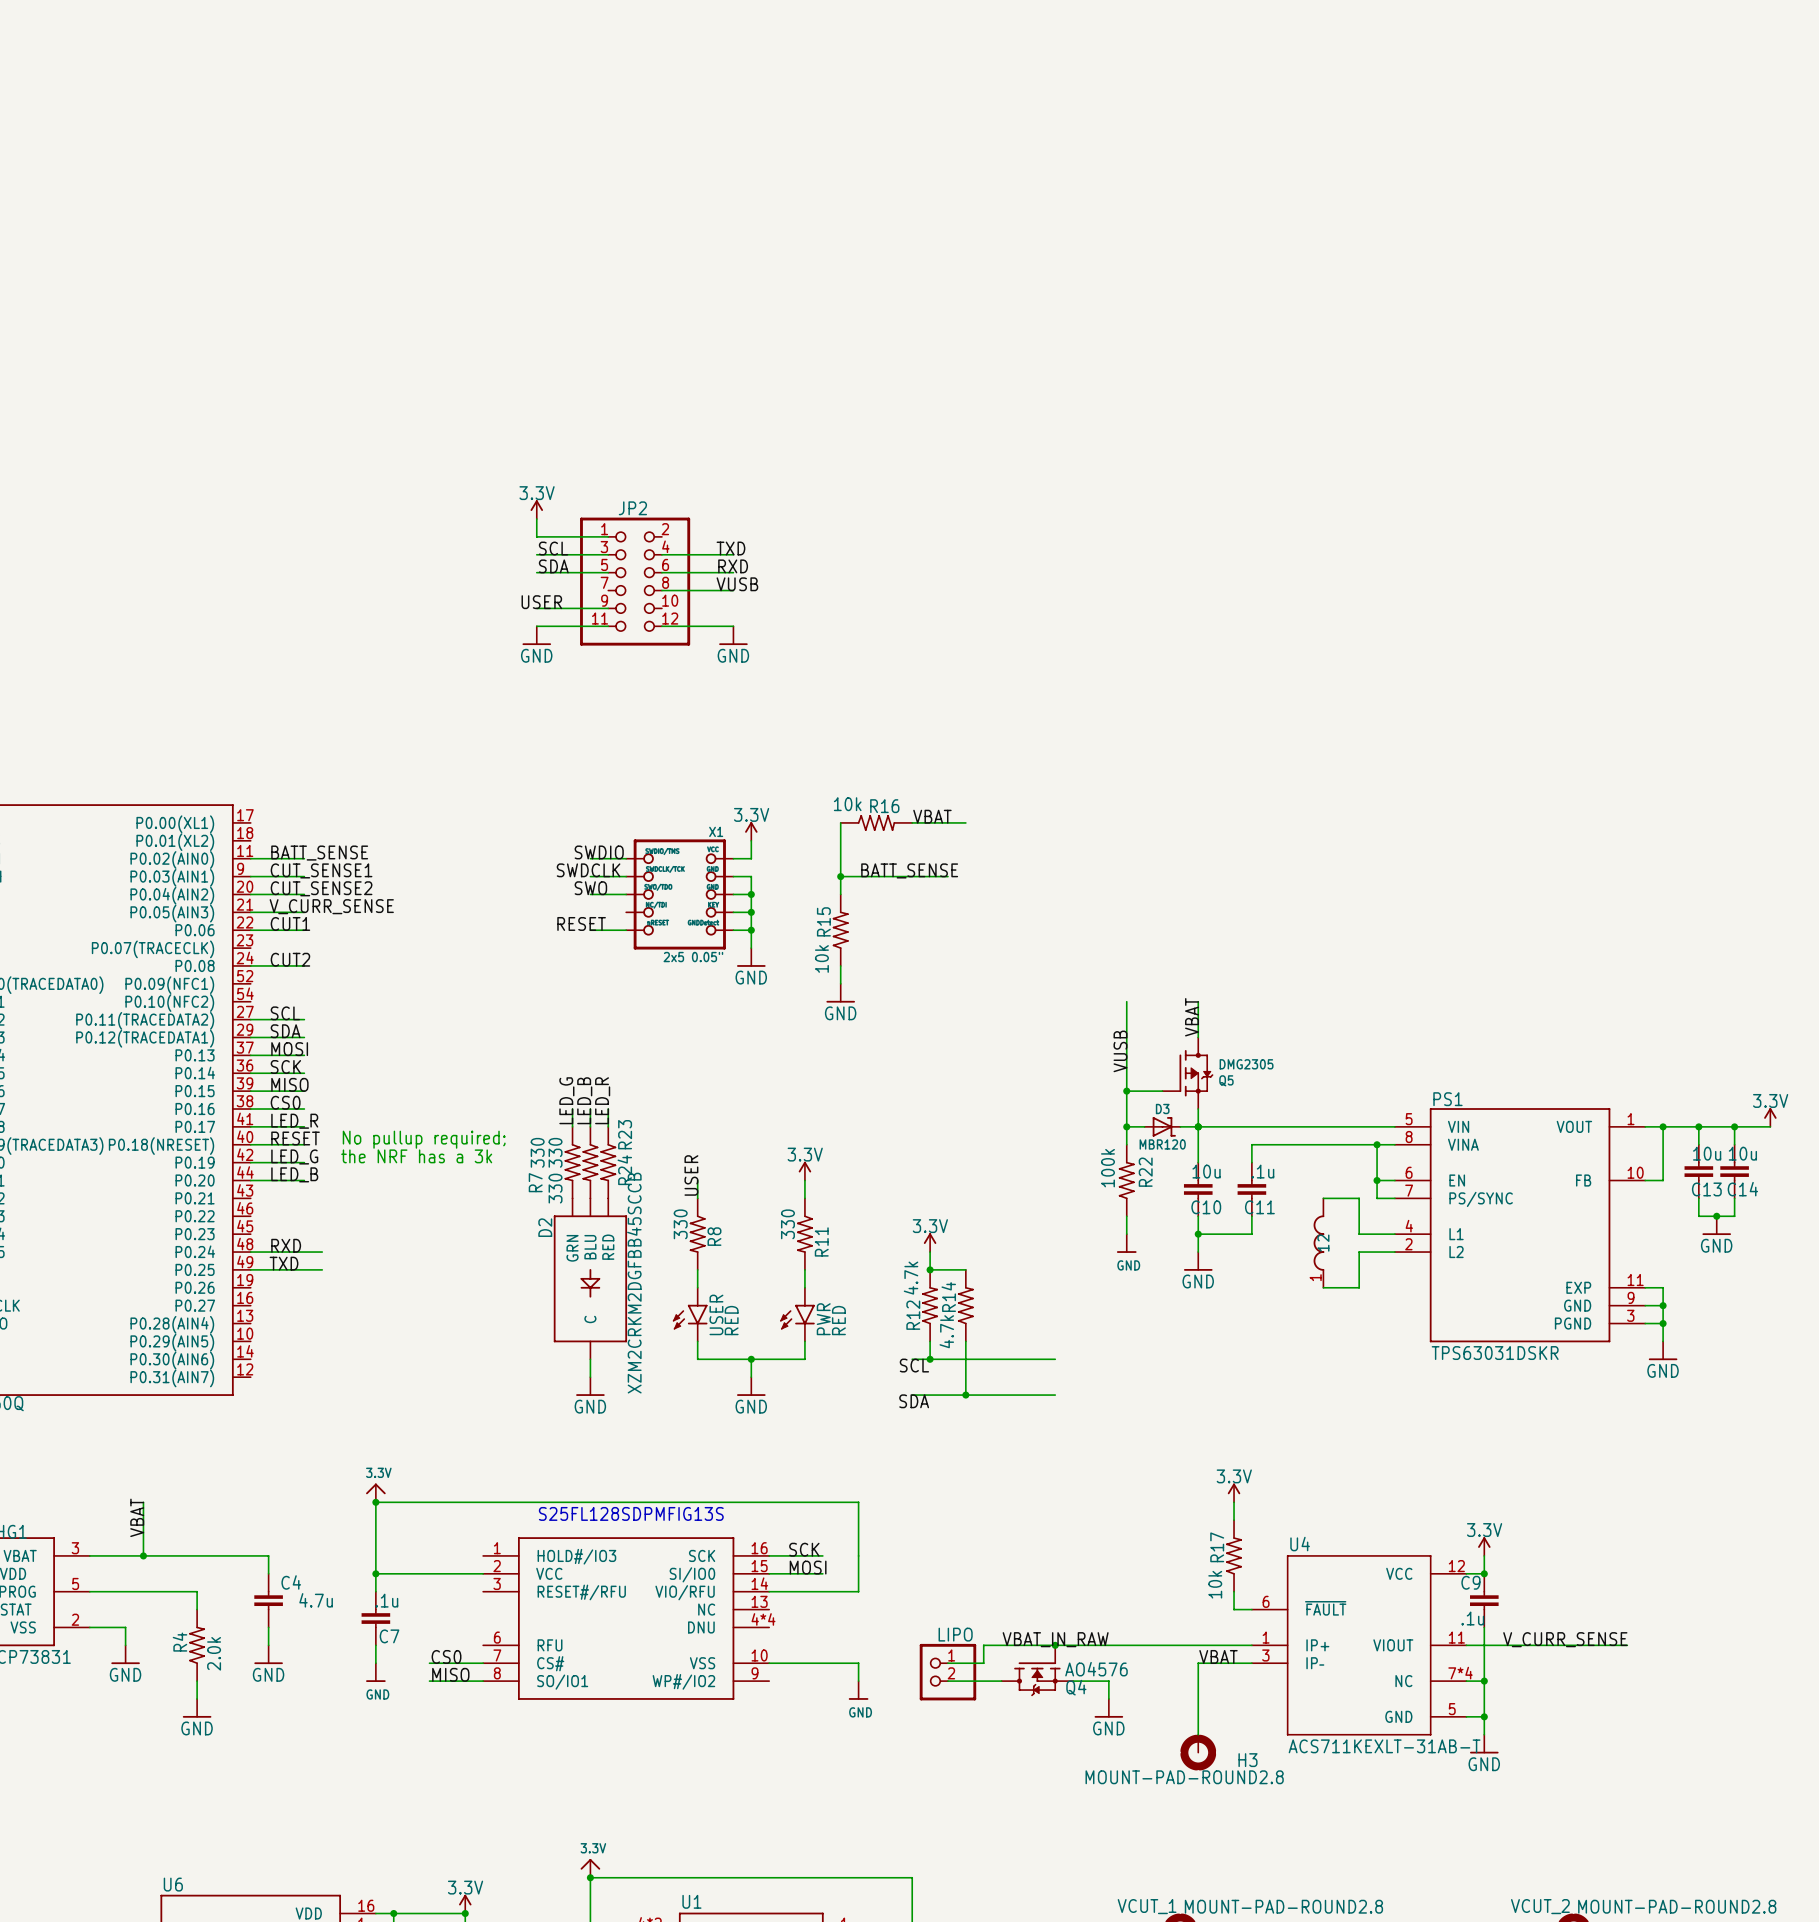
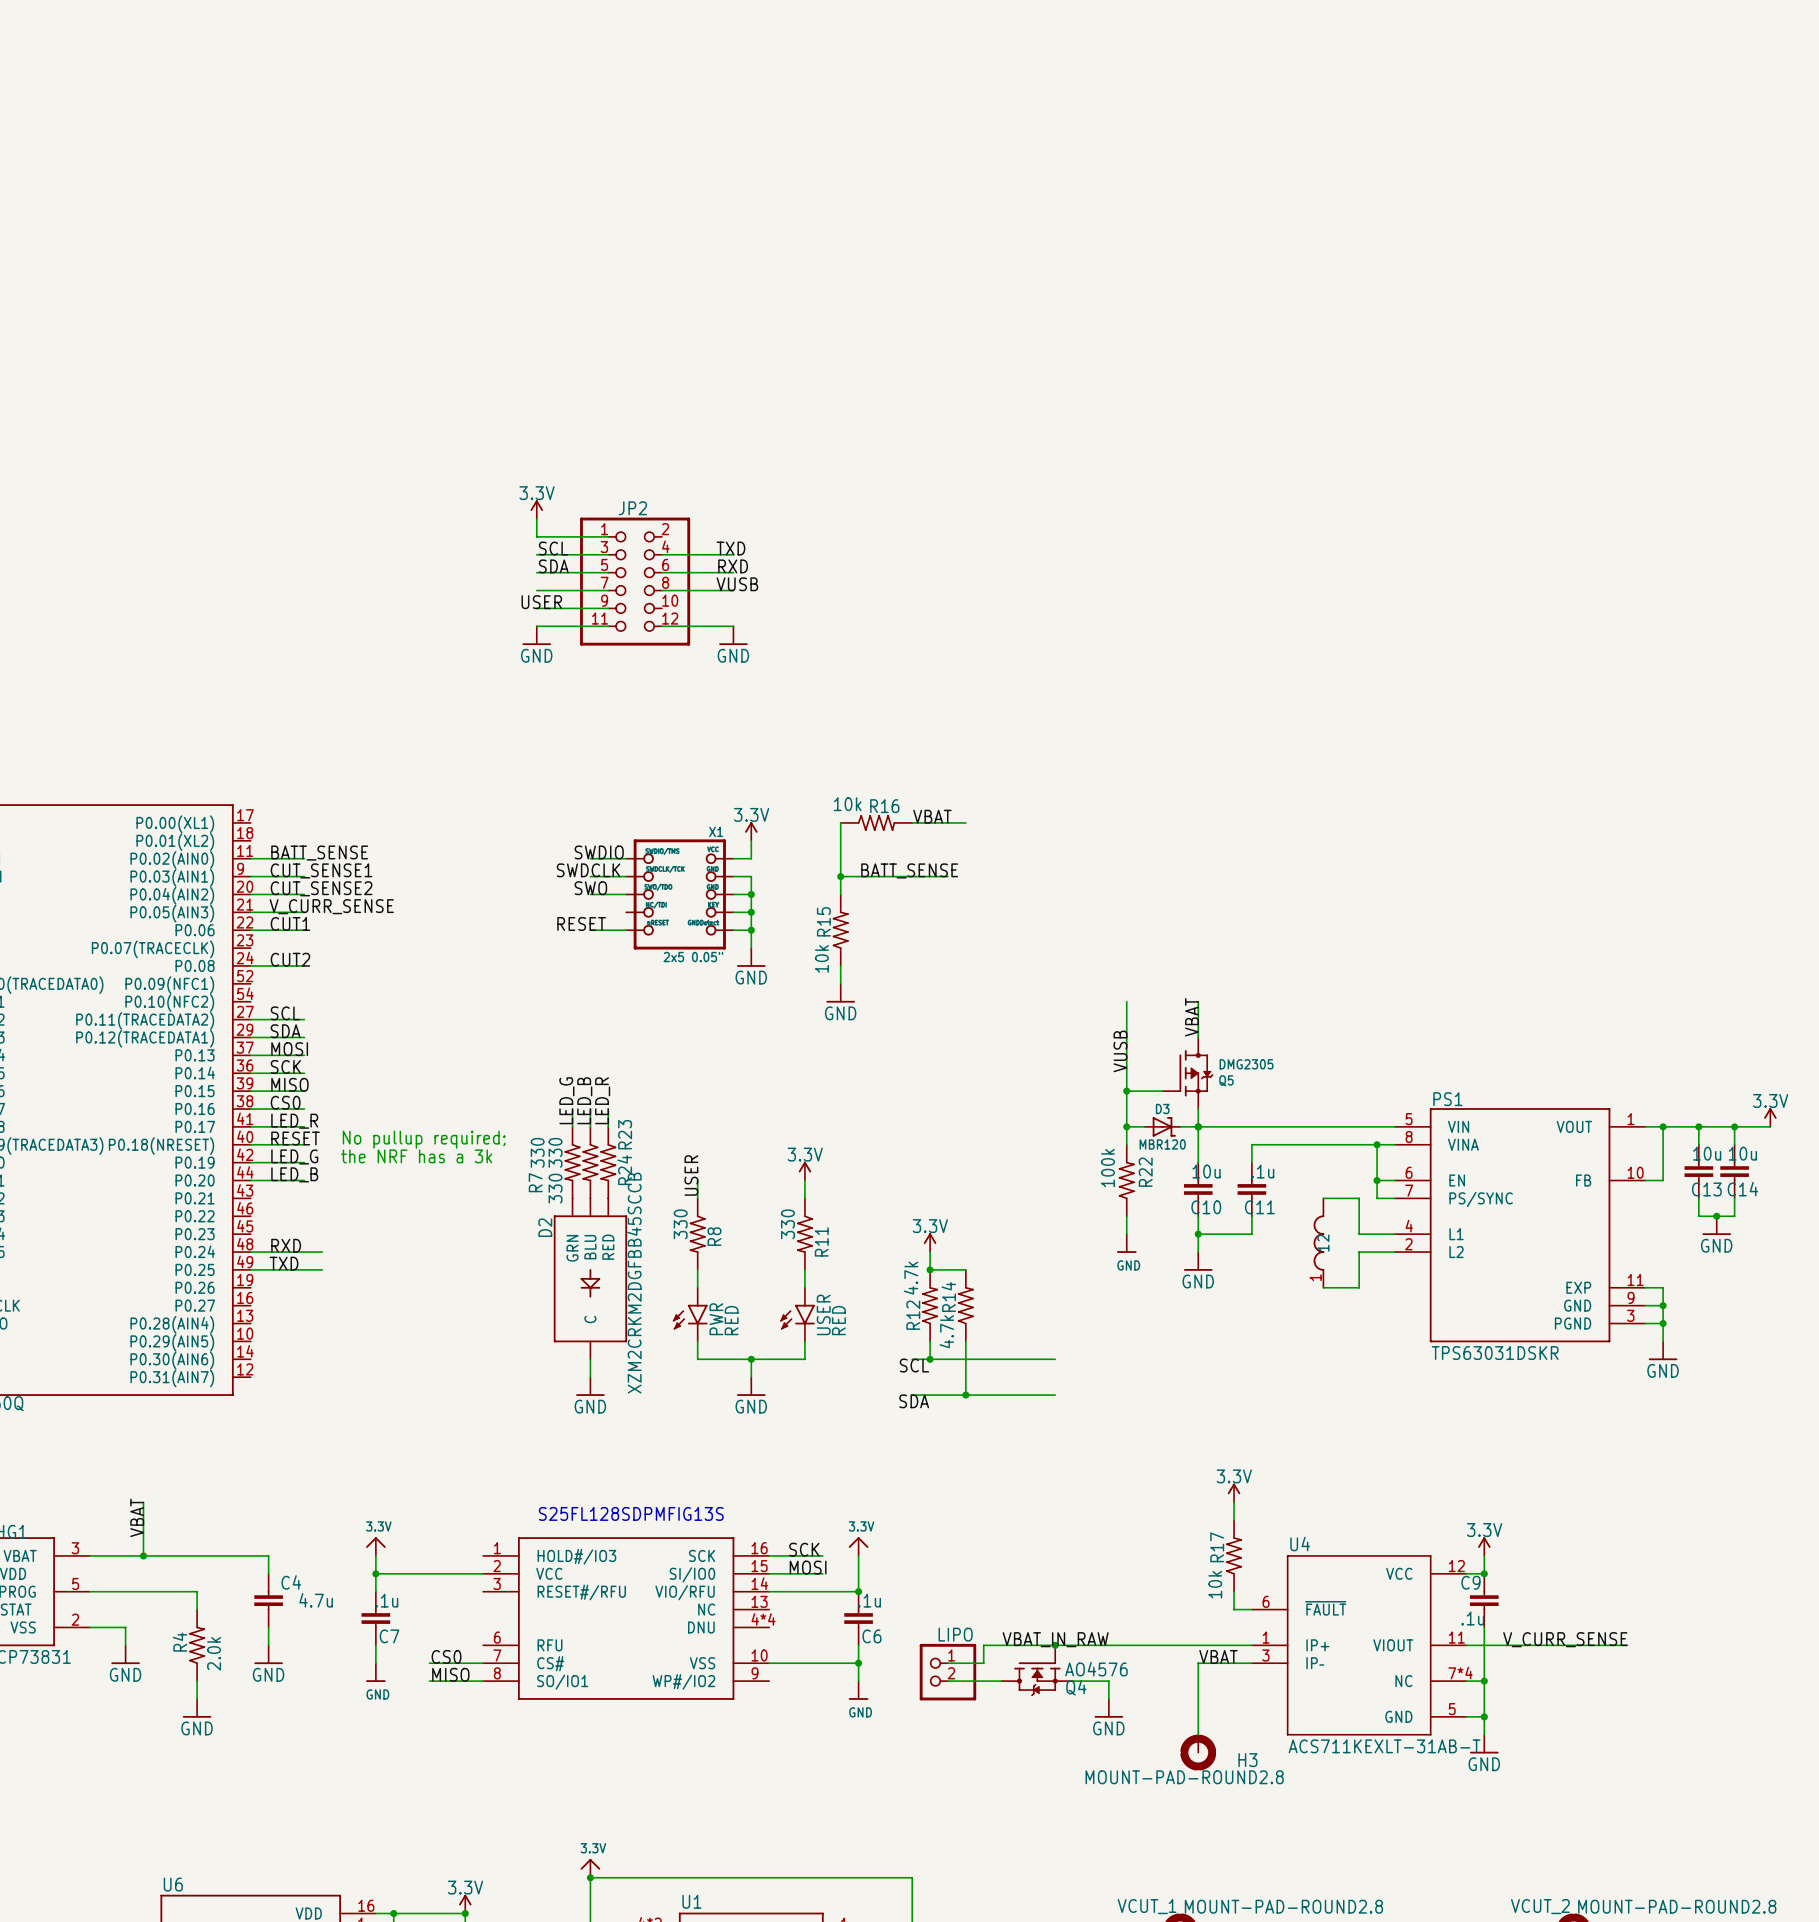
wire: none -> (536, 590) (608, 590)
USER name: USER (716, 1314) -> PWR (716, 1319)
PWR name: PWR (823, 1319) -> USER (823, 1314)
power symbol position: 3.3V (375, 1492) -> 3.3V (375, 1546)
junction: (375, 1502) -> none
power symbol: none -> 3.3V (858, 1546)
wire: (375, 1555) (375, 1502) (858, 1502) (858, 1555) -> none
junction: none -> (858, 1591)
C6: none -> .1u (858, 1618)
wire: none -> (858, 1645) (858, 1663)
junction: none -> (858, 1663)

